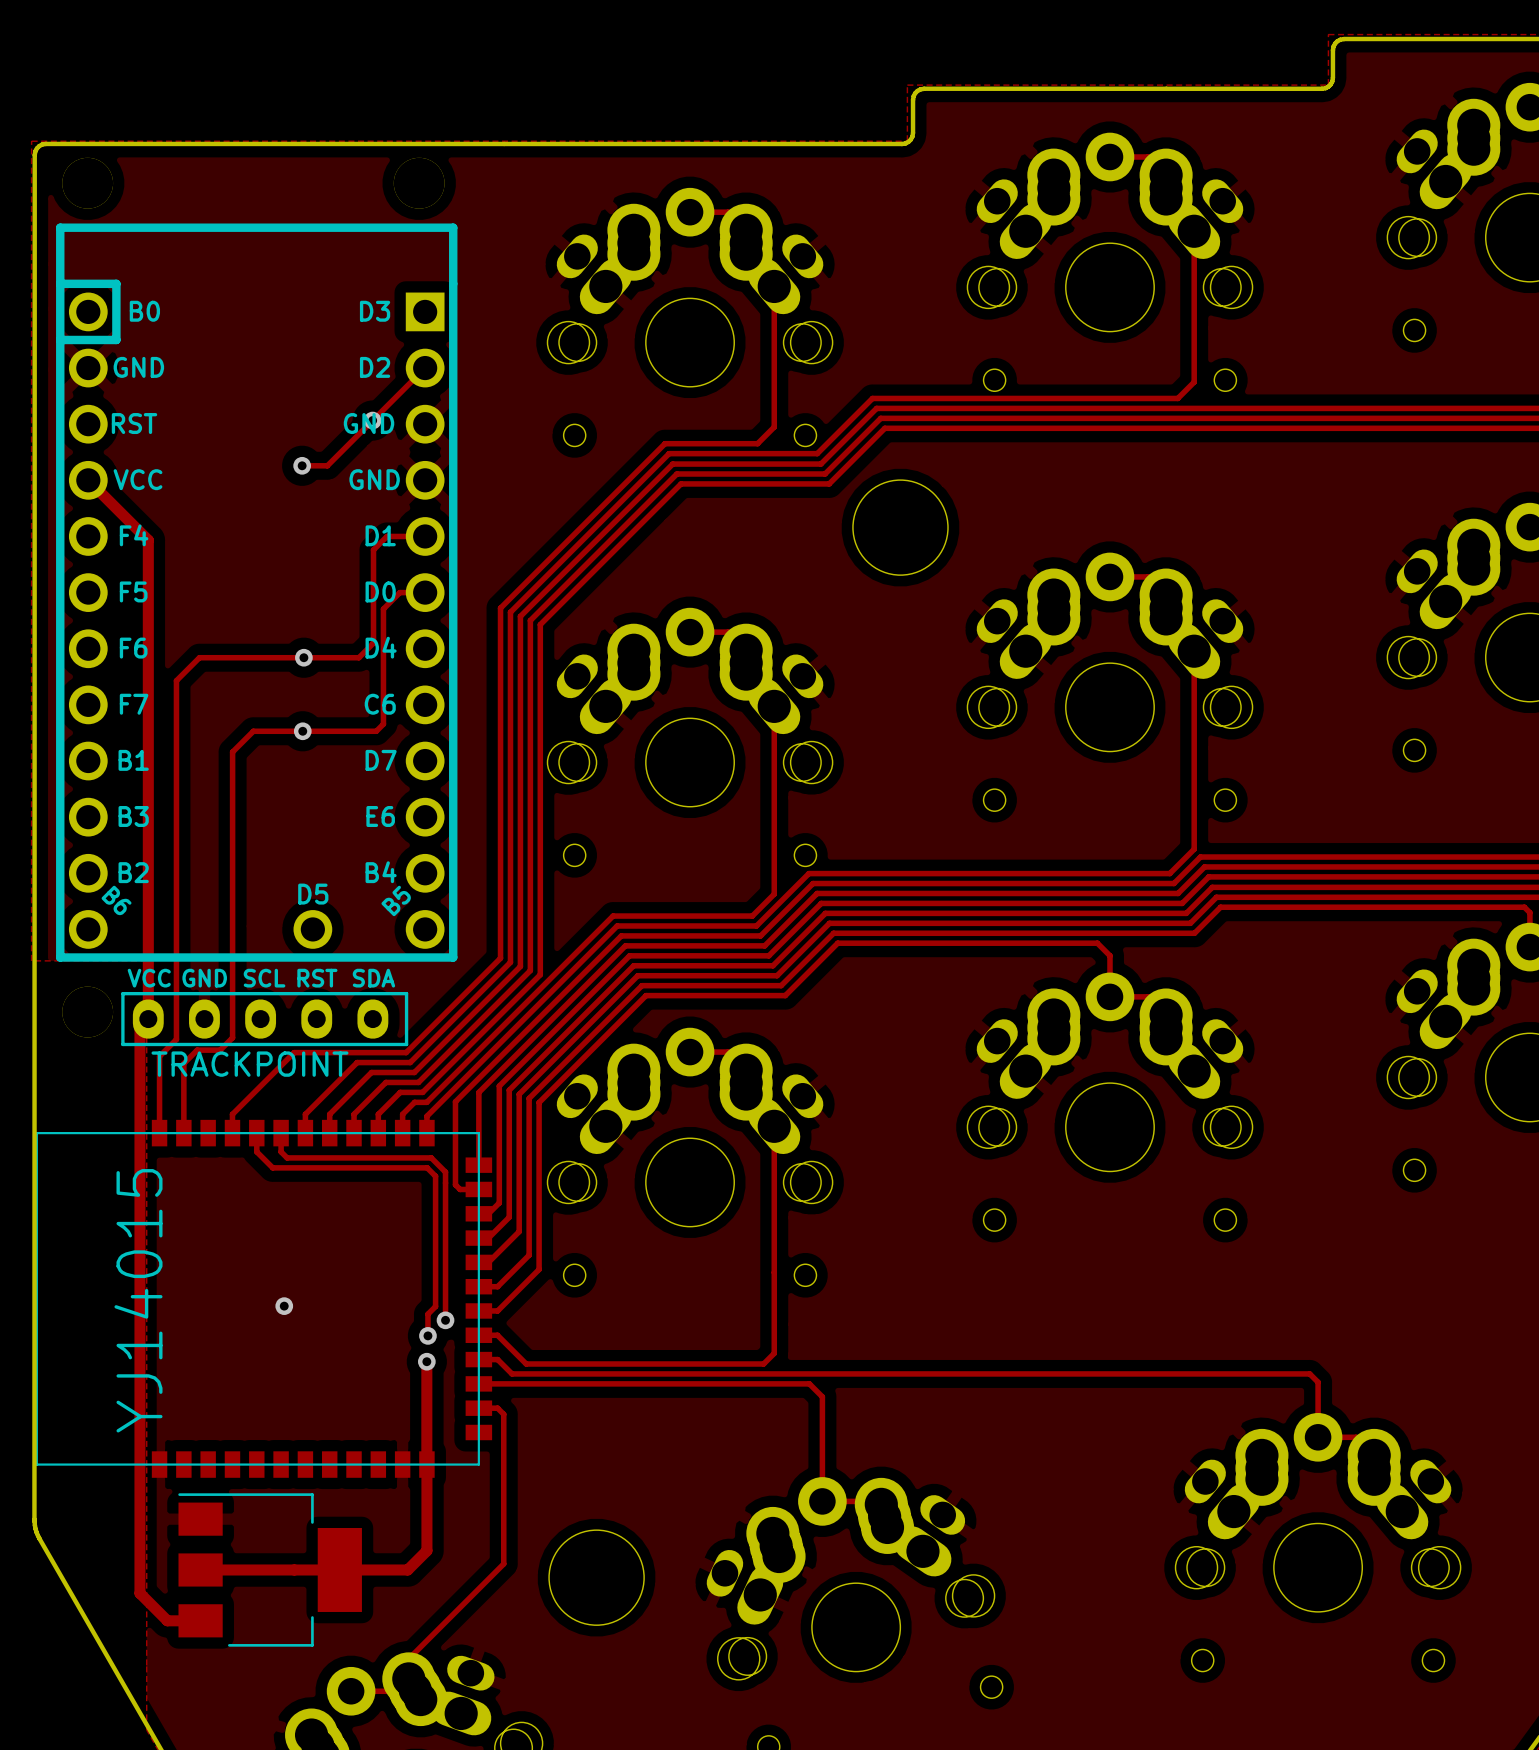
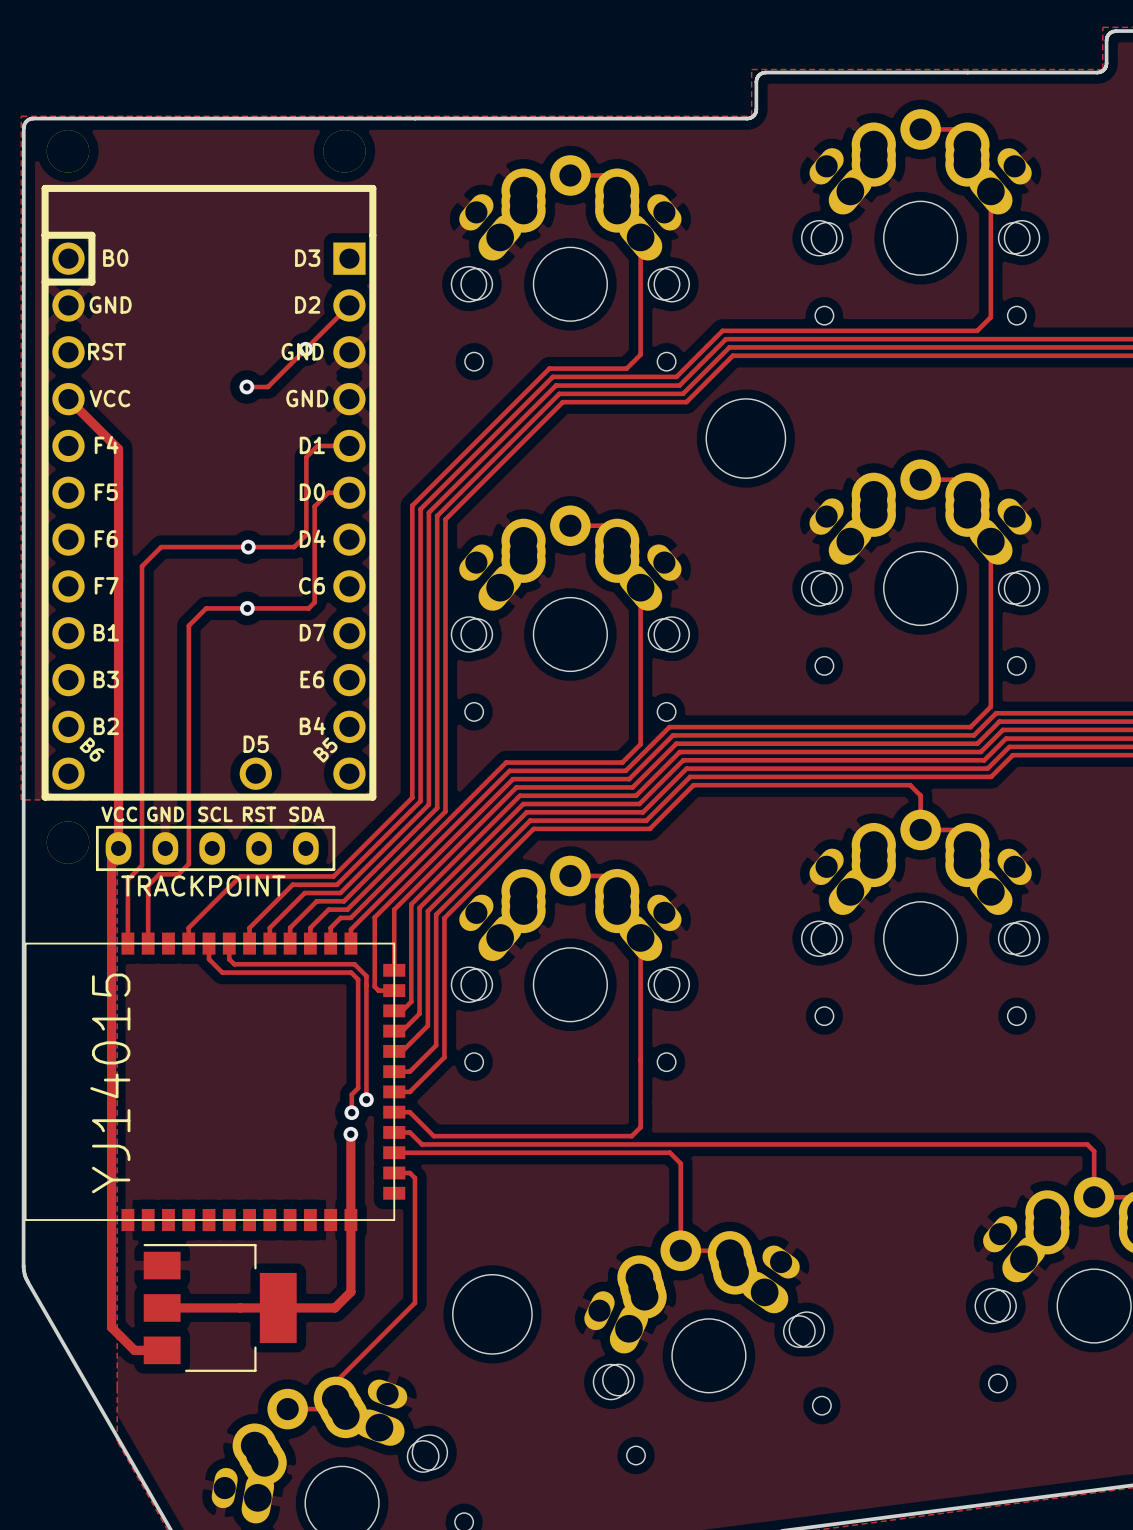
via: (284, 1306) -> none

